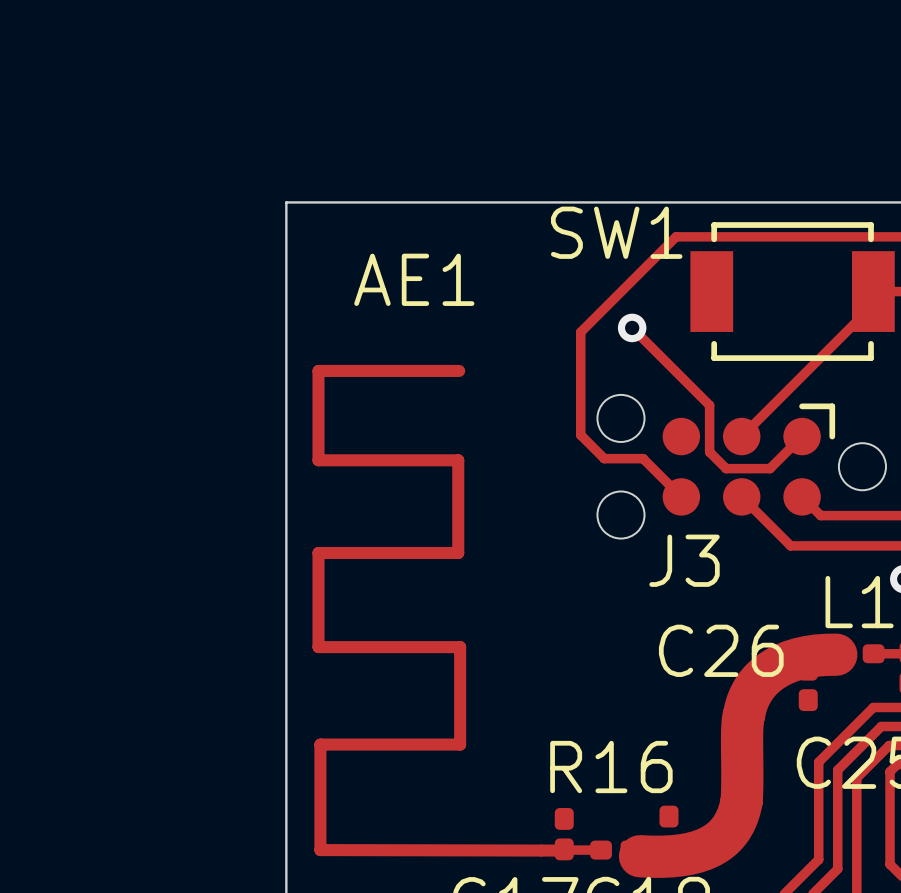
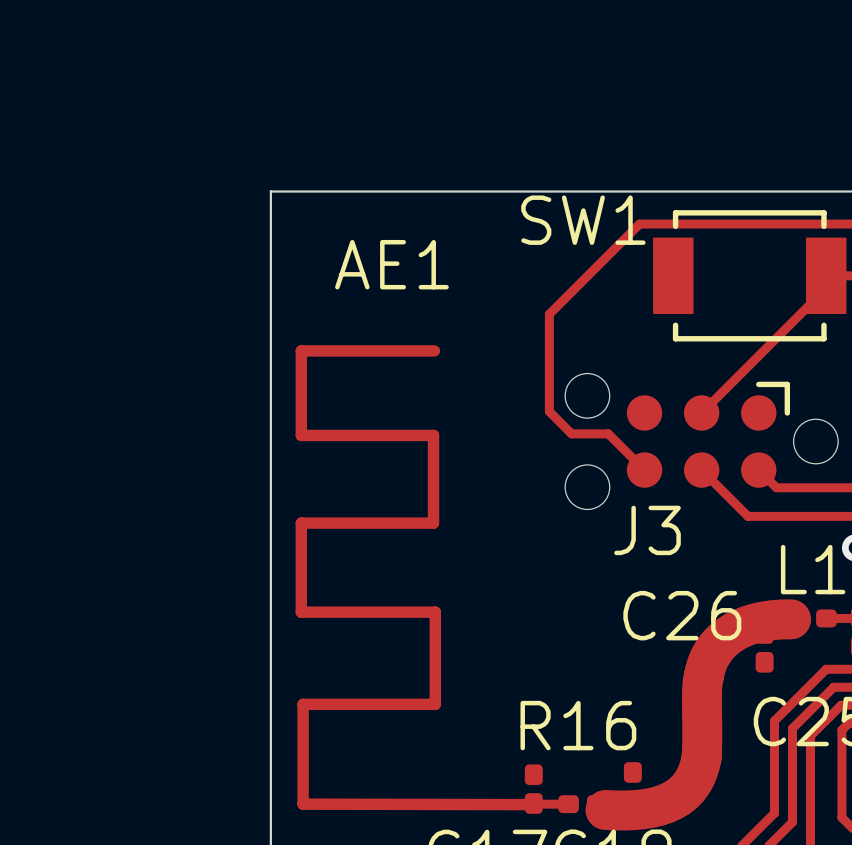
track: (631, 327) (709, 405) (709, 452) (726, 468) (769, 468) (802, 436) -> none
via: (632, 327) -> none

